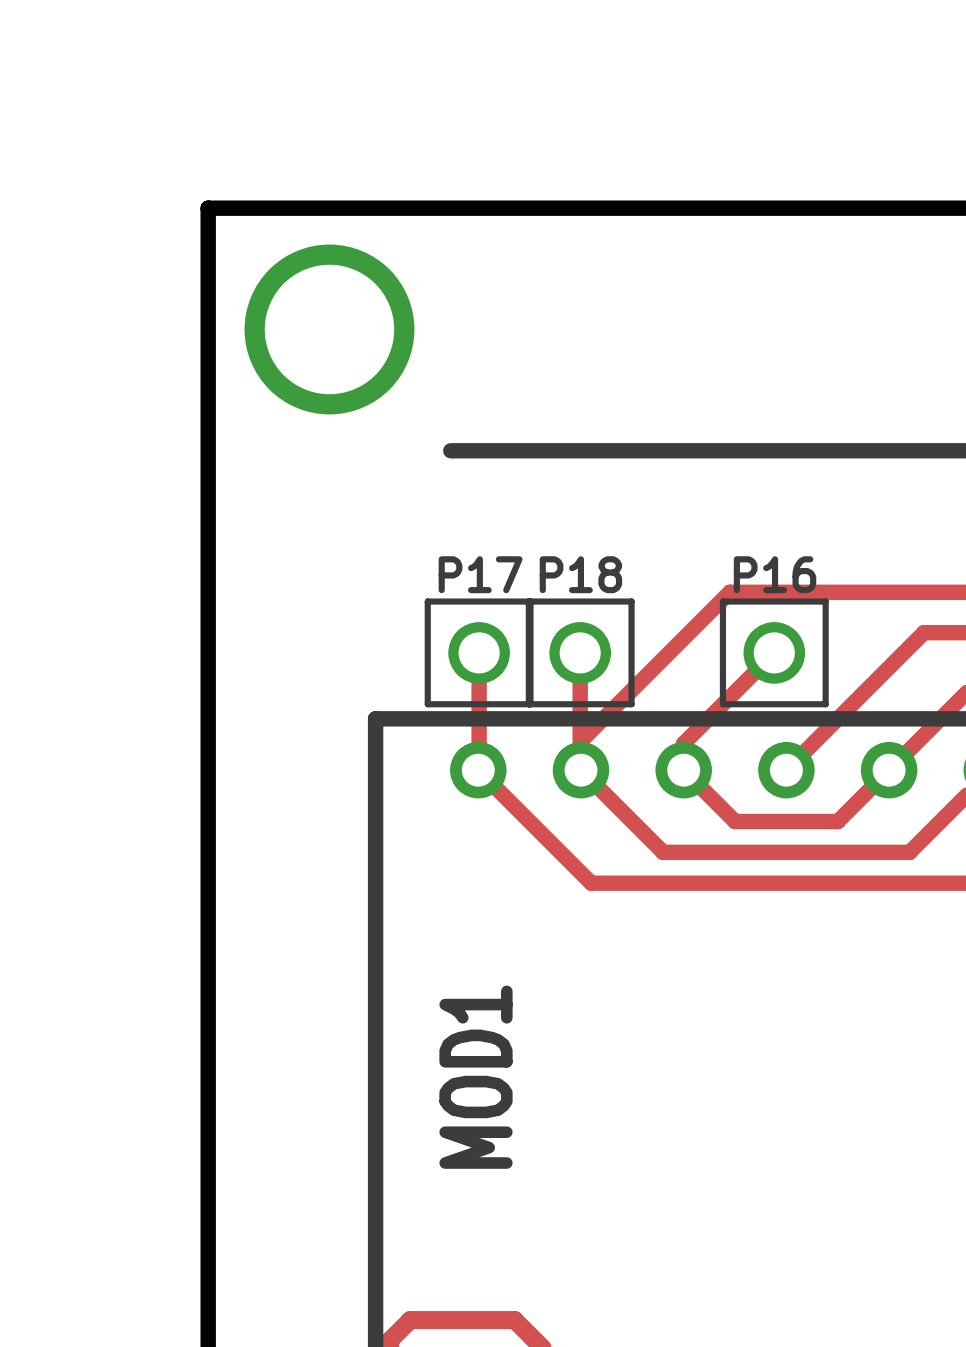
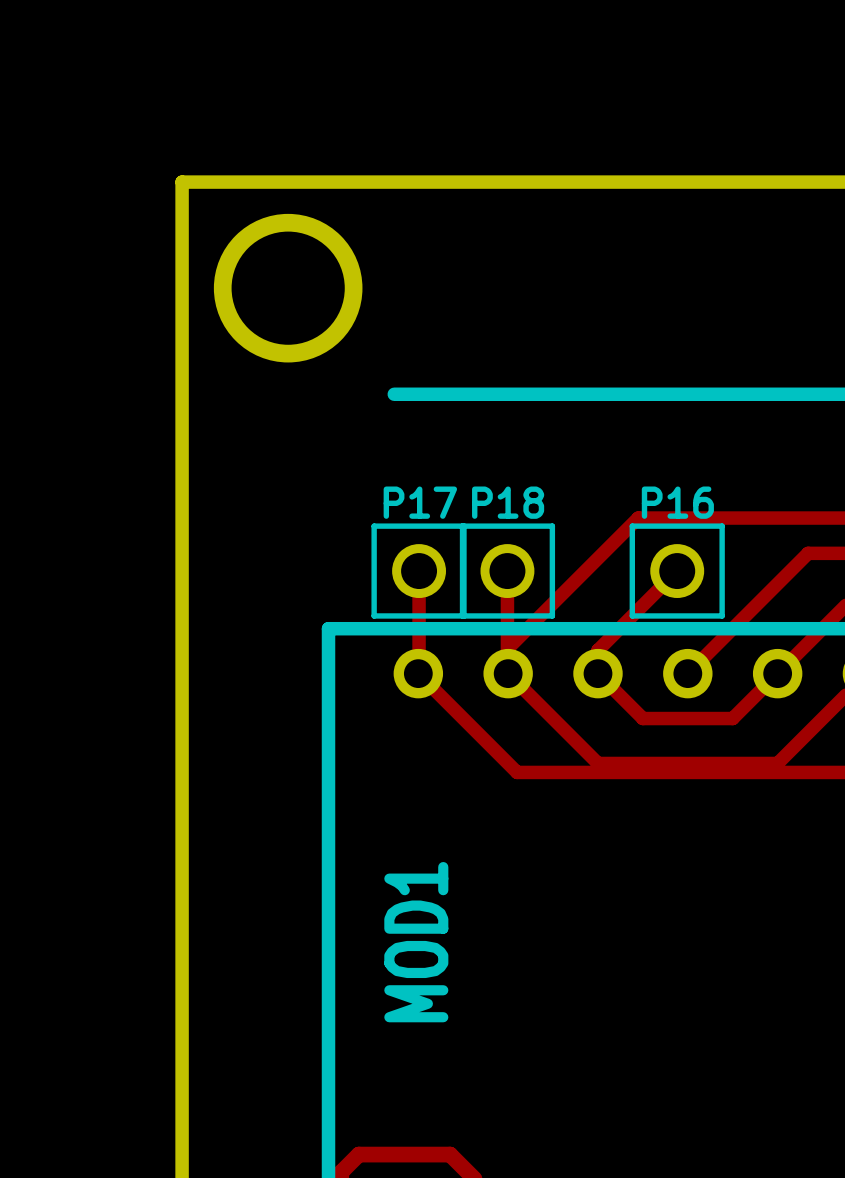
track: (663, 852) (909, 852) -> (580, 745) (597, 763) (777, 763) (795, 745)

